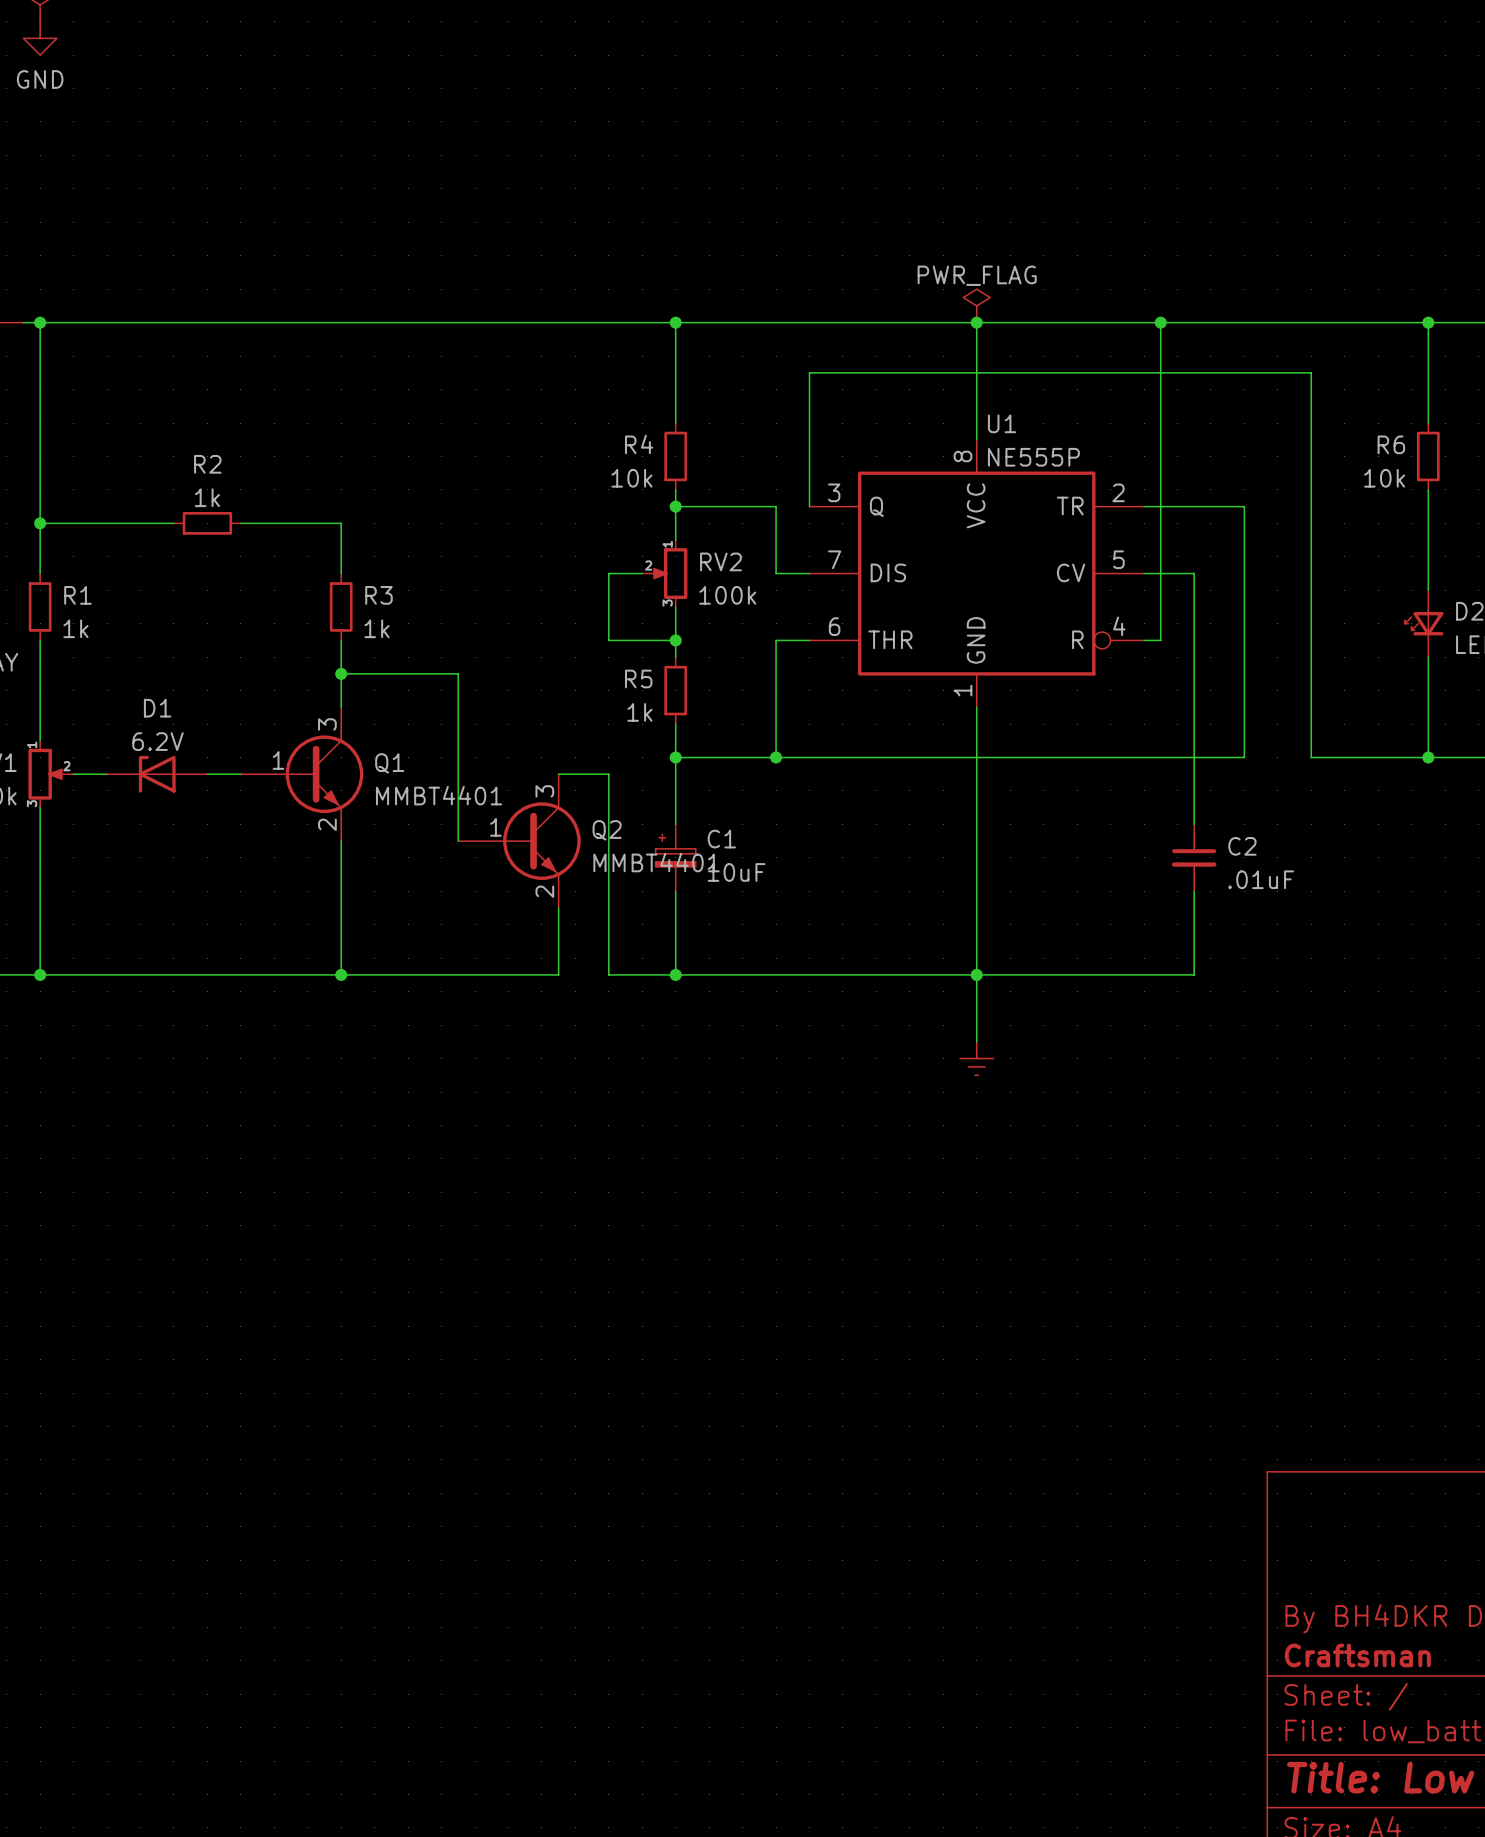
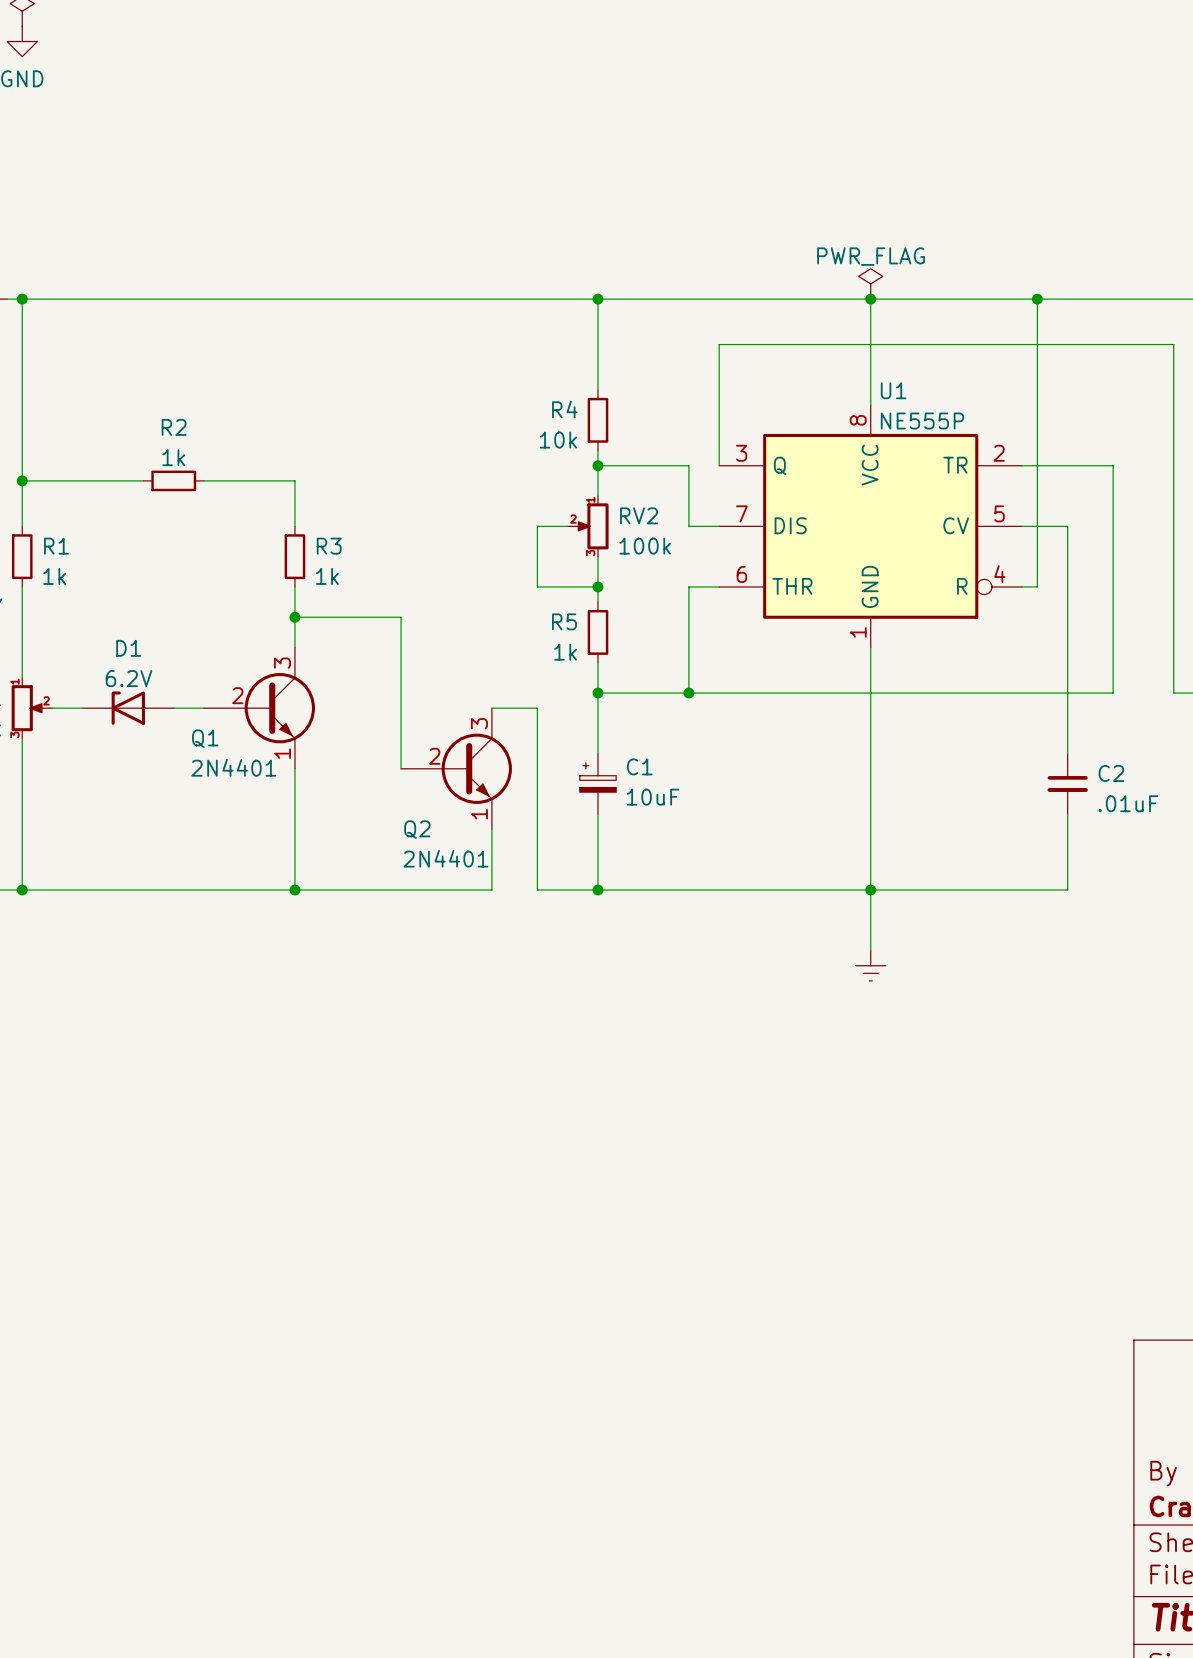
Q1 pin number: 1 (278, 760) -> 2 (237, 695)
Q1 name position: Q1 (389, 763) -> Q1 (205, 738)
Q1 value: MMBT4401 (439, 795) -> 2N4401 (233, 767)
Q1 pin number: 2 (327, 824) -> 1 (282, 753)
Q2 pin number: 1 (495, 827) -> 2 (434, 756)
Q2 name position: Q2 (607, 830) -> Q2 (417, 829)
Q2 value: MMBT4401 (656, 862) -> 2N4401 (445, 858)
Q2 pin number: 2 (544, 891) -> 1 (479, 814)

